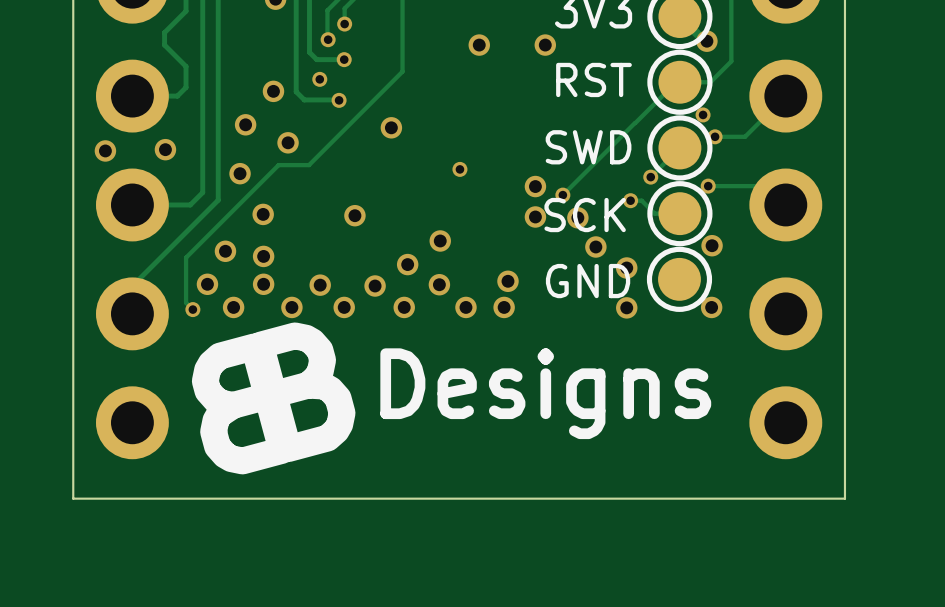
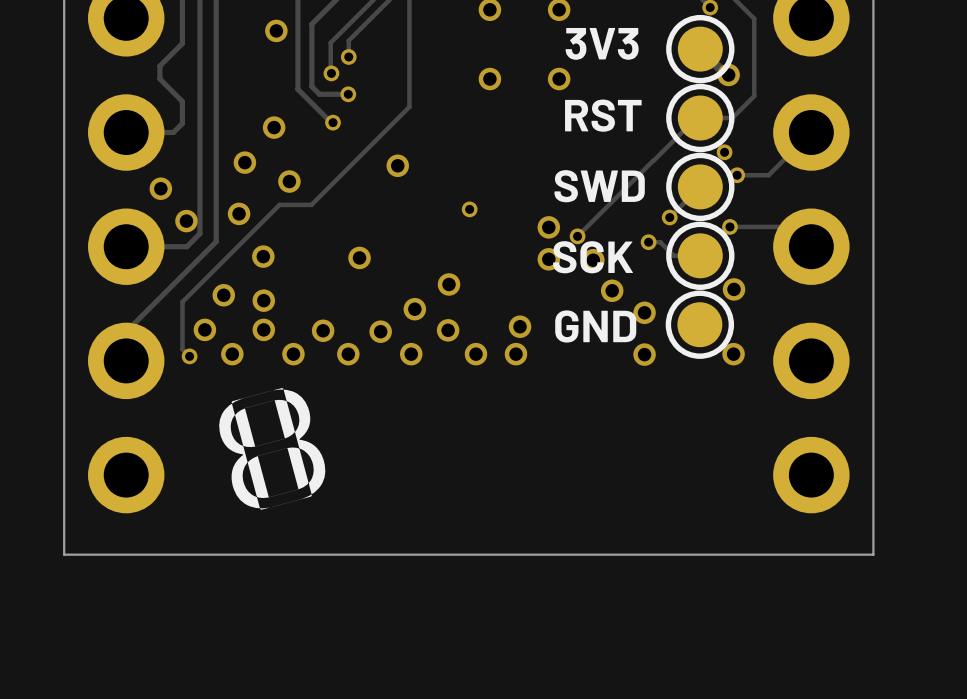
track: (296, 54) (296, 91) (304, 99) (338, 99) -> (297, 89) (333, 122)
via: (319, 79) -> none
via: none -> (333, 122)
via: (339, 100) -> none
via position: (105, 150) -> (186, 221)
text: Designs (545, 393) -> none

